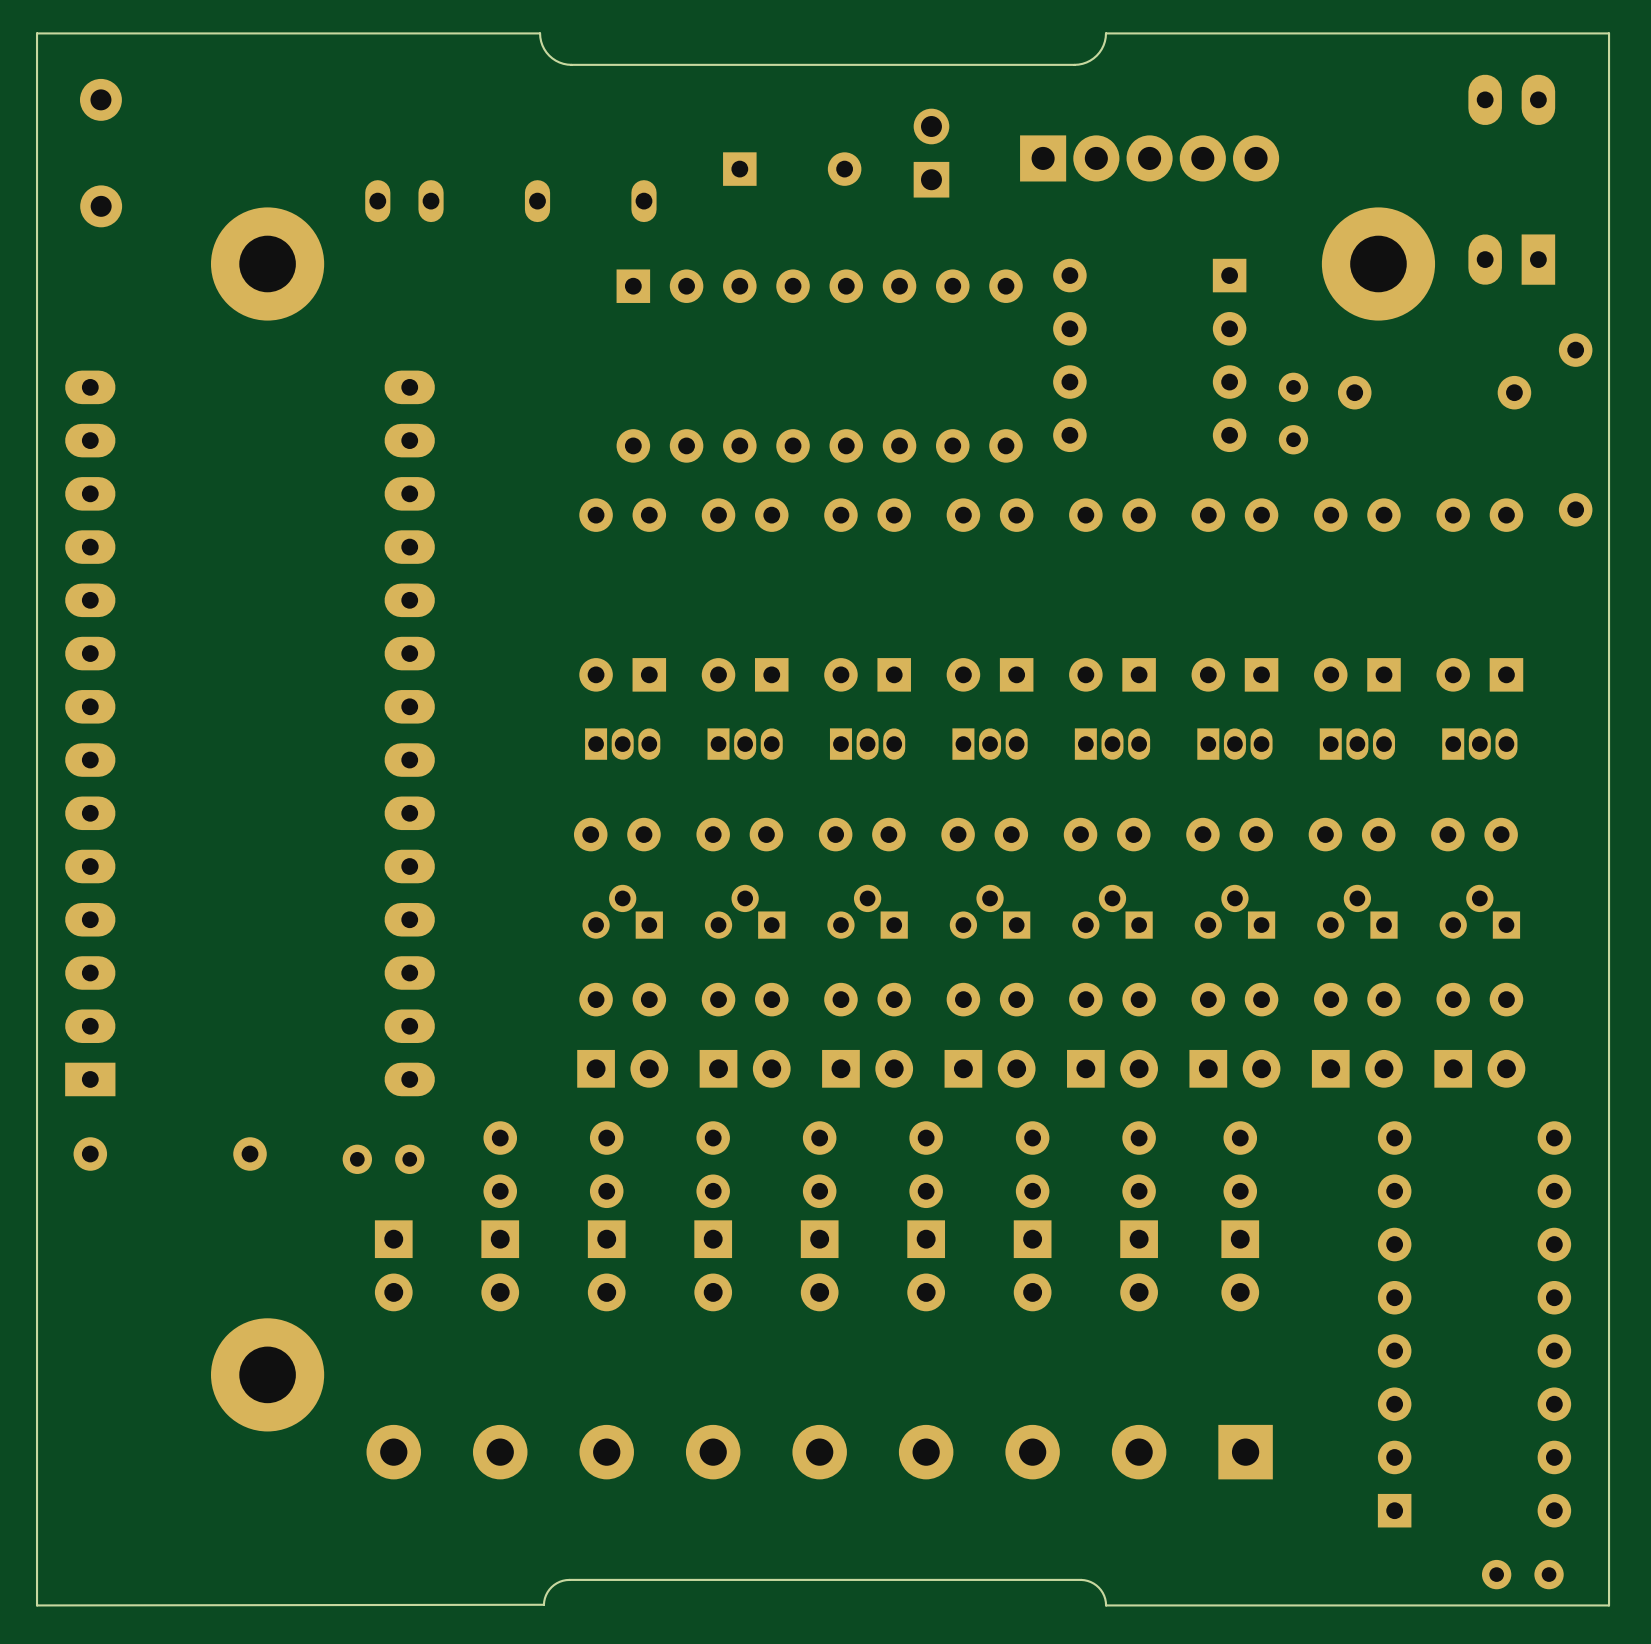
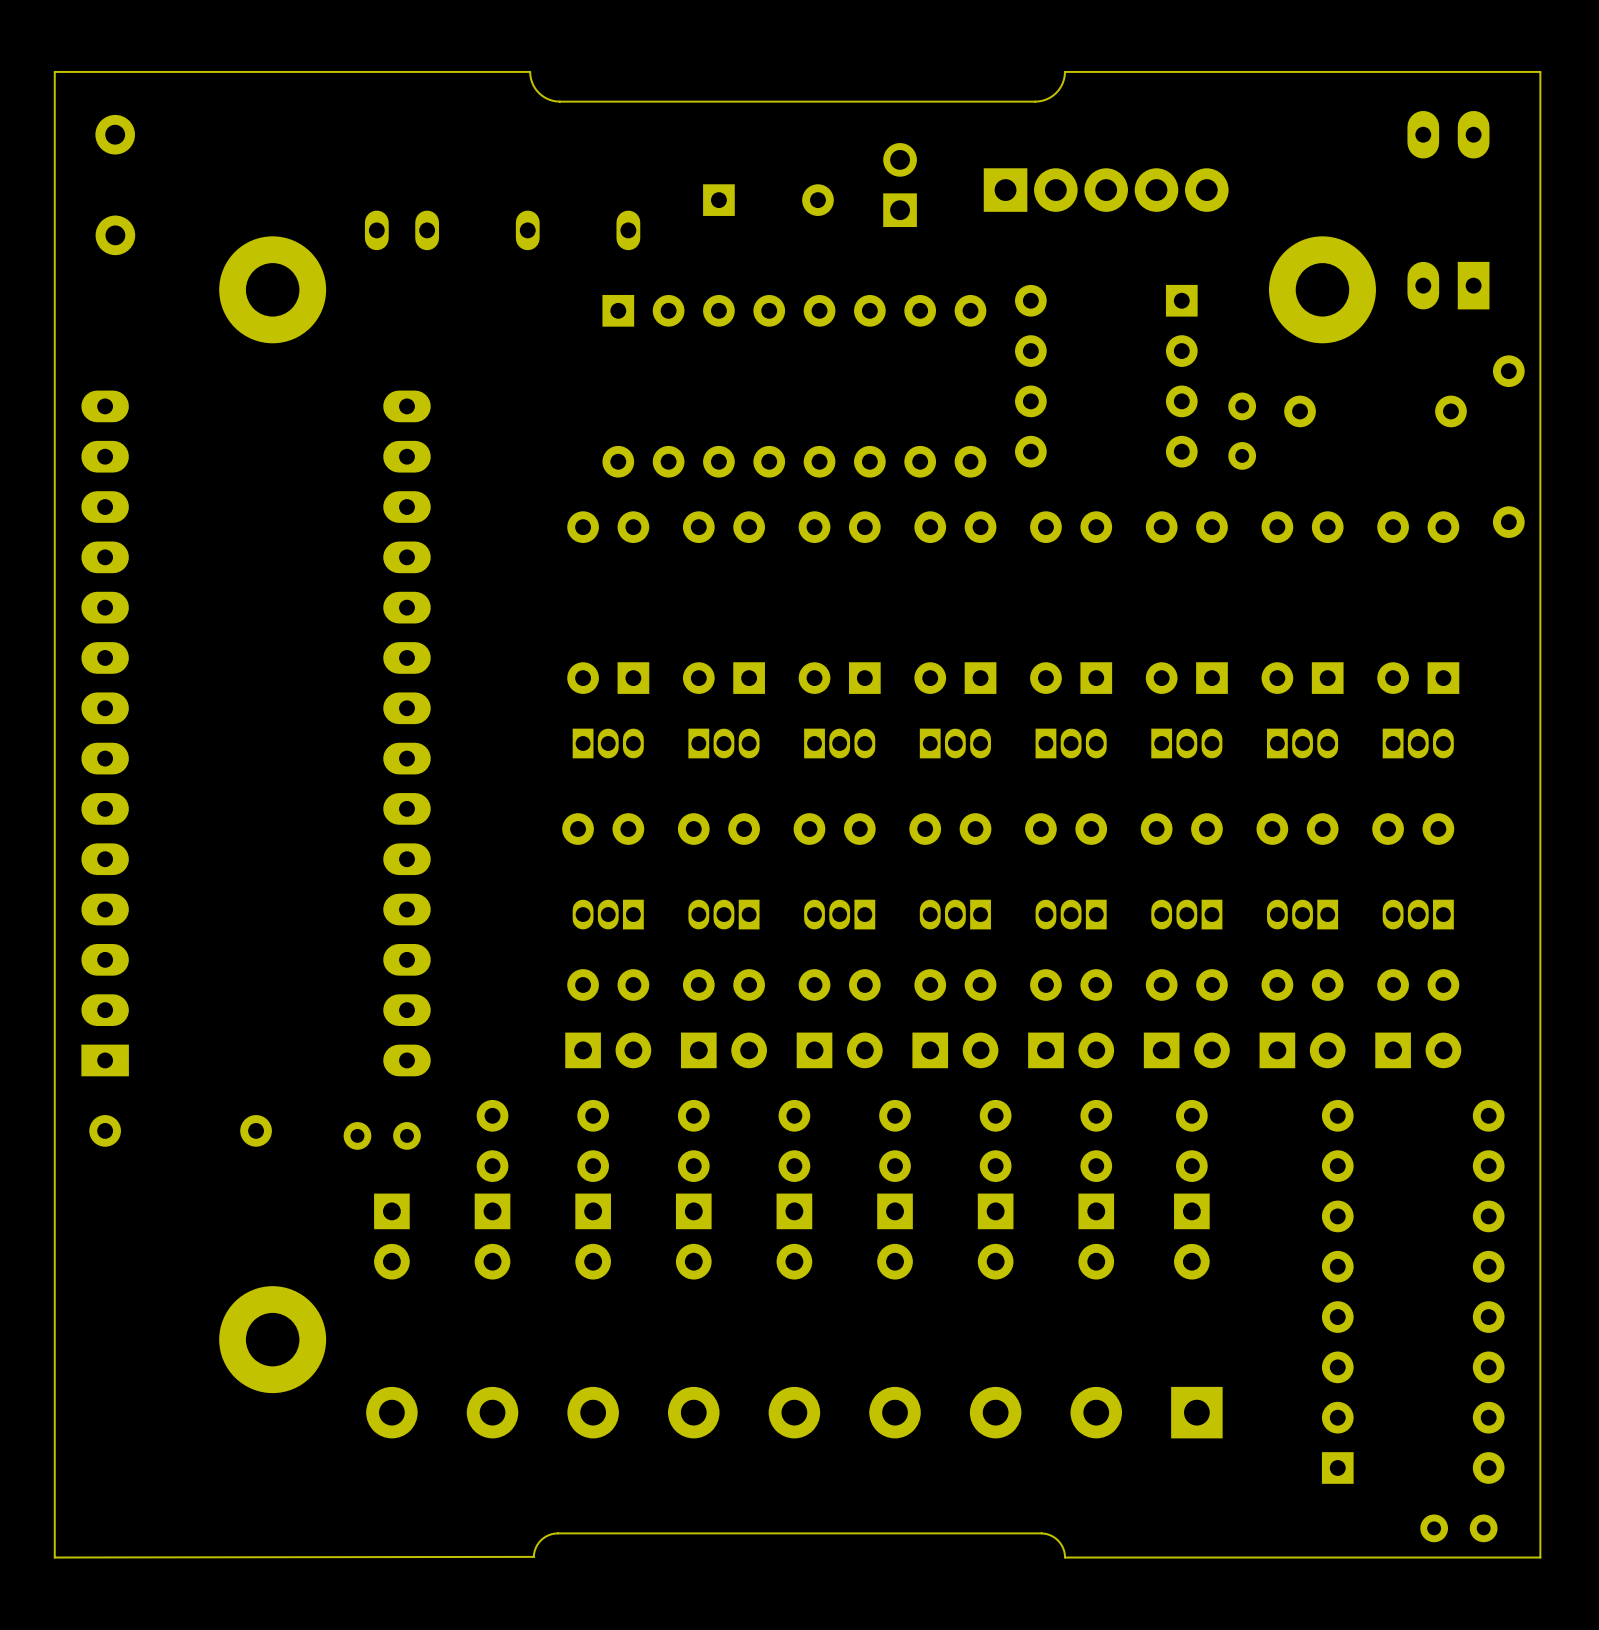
part footprint: [582, 884, 663, 939] -> [572, 899, 644, 930]
part footprint: [704, 884, 786, 939] -> [688, 899, 760, 930]
part footprint: [827, 884, 908, 939] -> [804, 899, 876, 930]
part footprint: [949, 884, 1031, 939] -> [919, 899, 991, 930]
part footprint: [1072, 884, 1153, 939] -> [1035, 899, 1107, 930]
part footprint: [1194, 884, 1276, 939] -> [1151, 899, 1223, 930]
part footprint: [1317, 884, 1398, 939] -> [1266, 899, 1339, 930]
part footprint: [1439, 884, 1521, 939] -> [1382, 899, 1454, 930]

